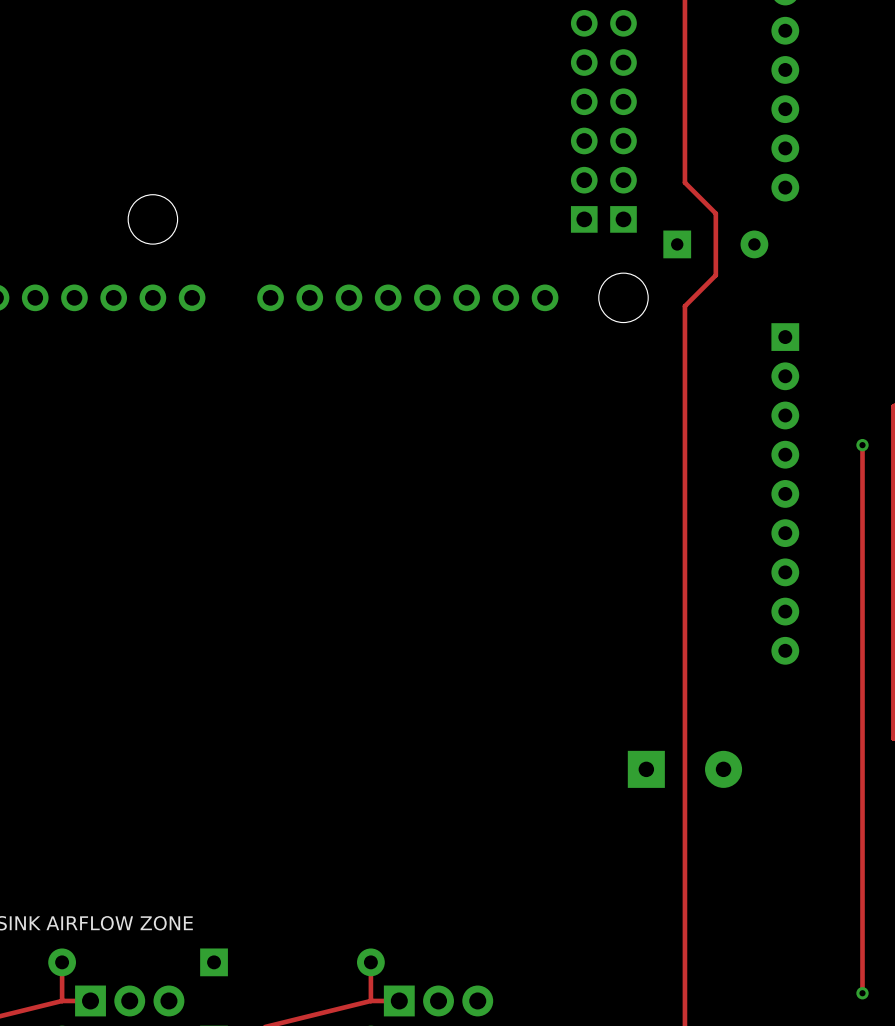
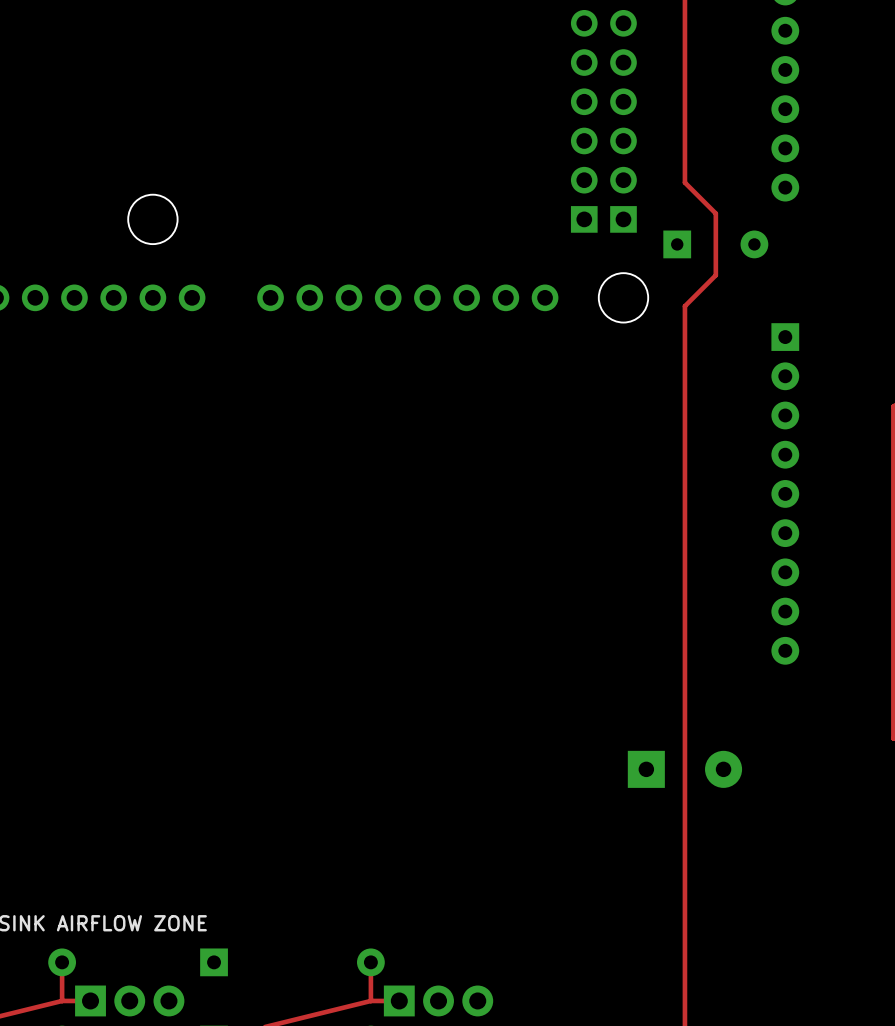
track: (862, 445) (862, 993) -> none
via: (862, 445) -> none
via: (862, 993) -> none

